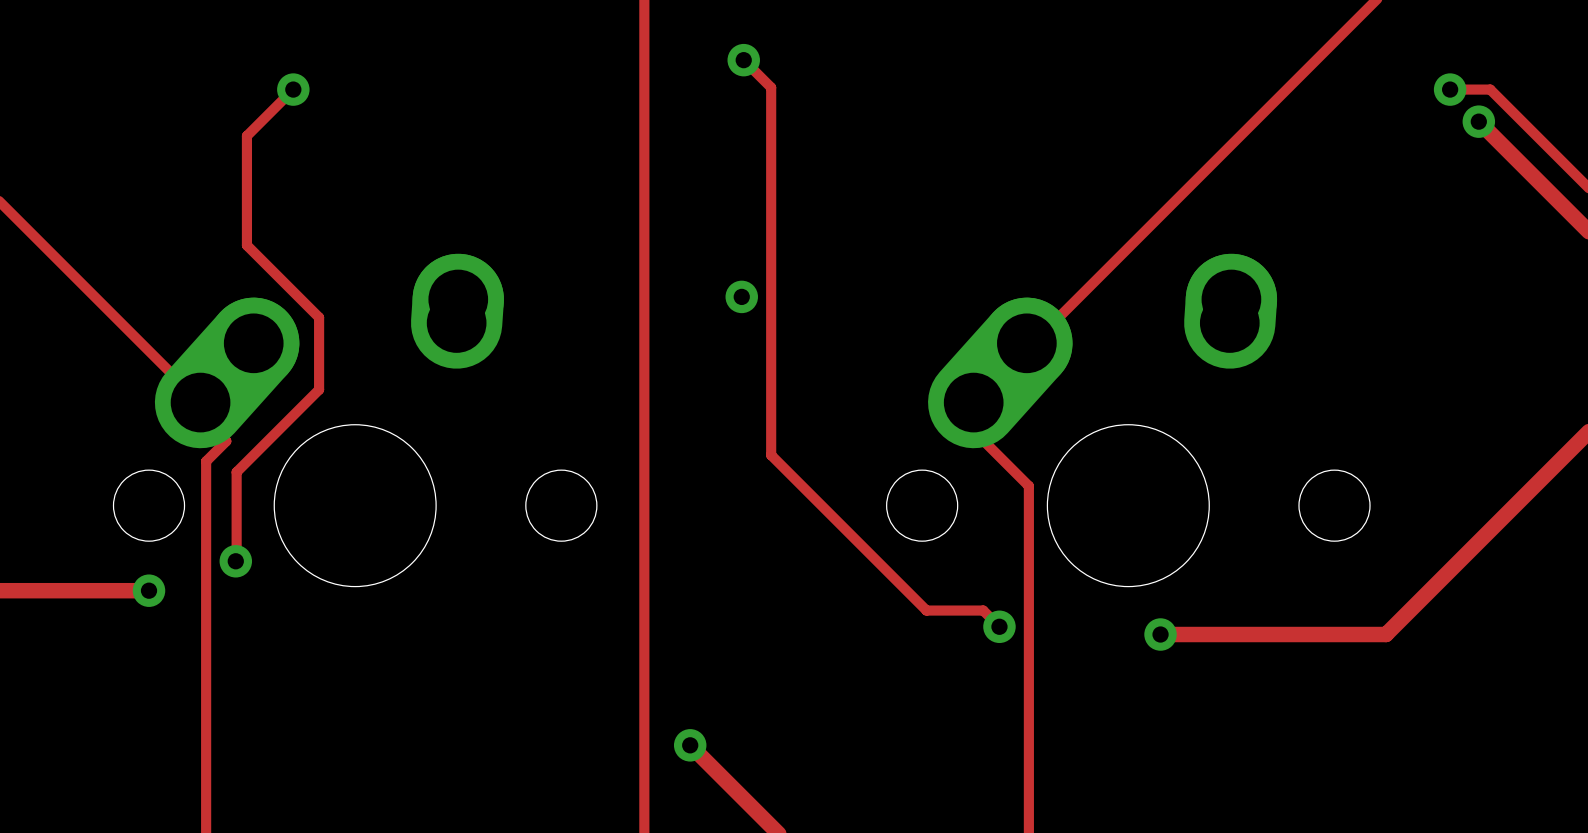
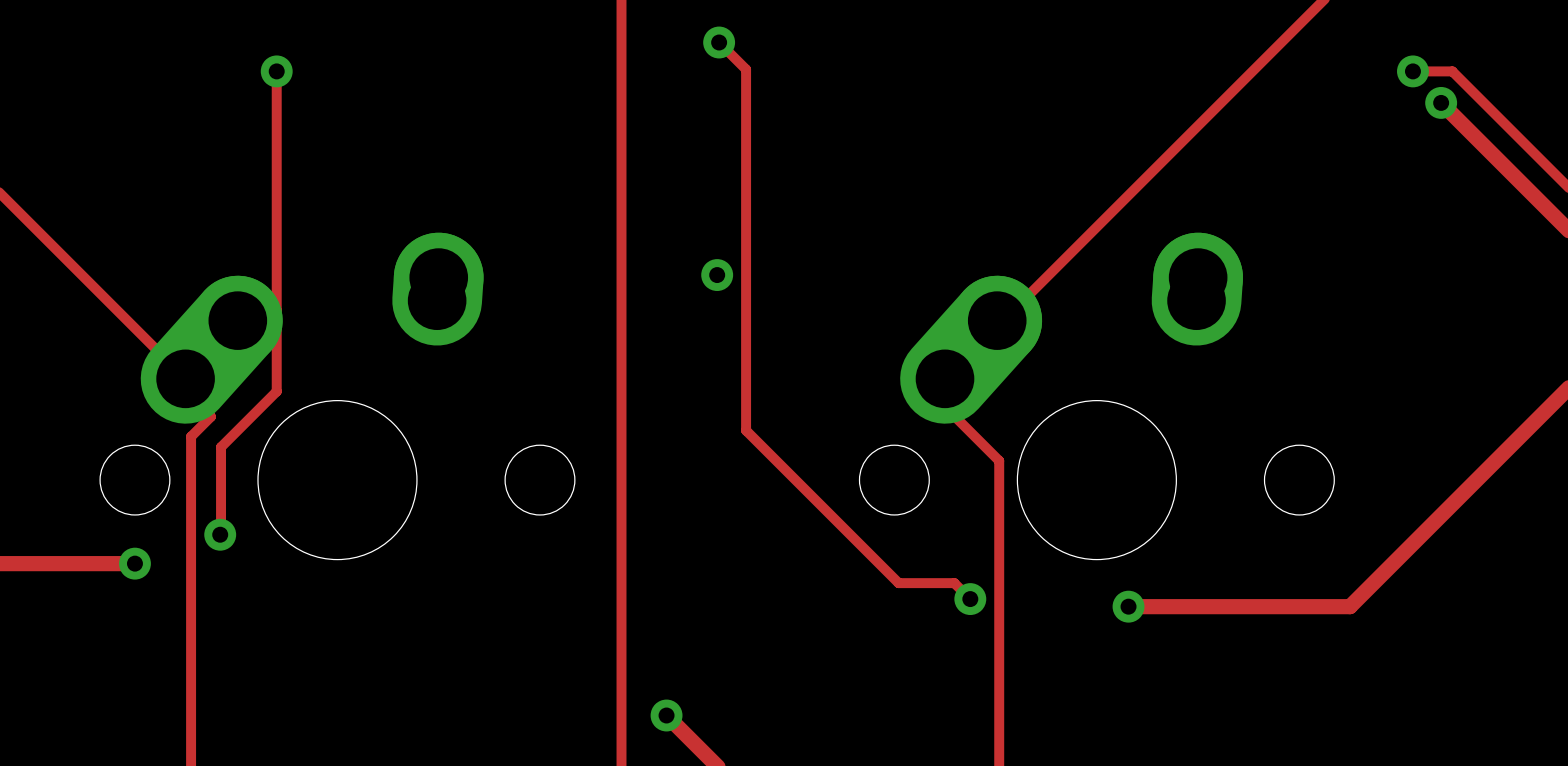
track: (293, 89) (246, 135) (246, 245) (319, 317) (319, 389) (293, 415) -> (276, 71) (276, 391)

